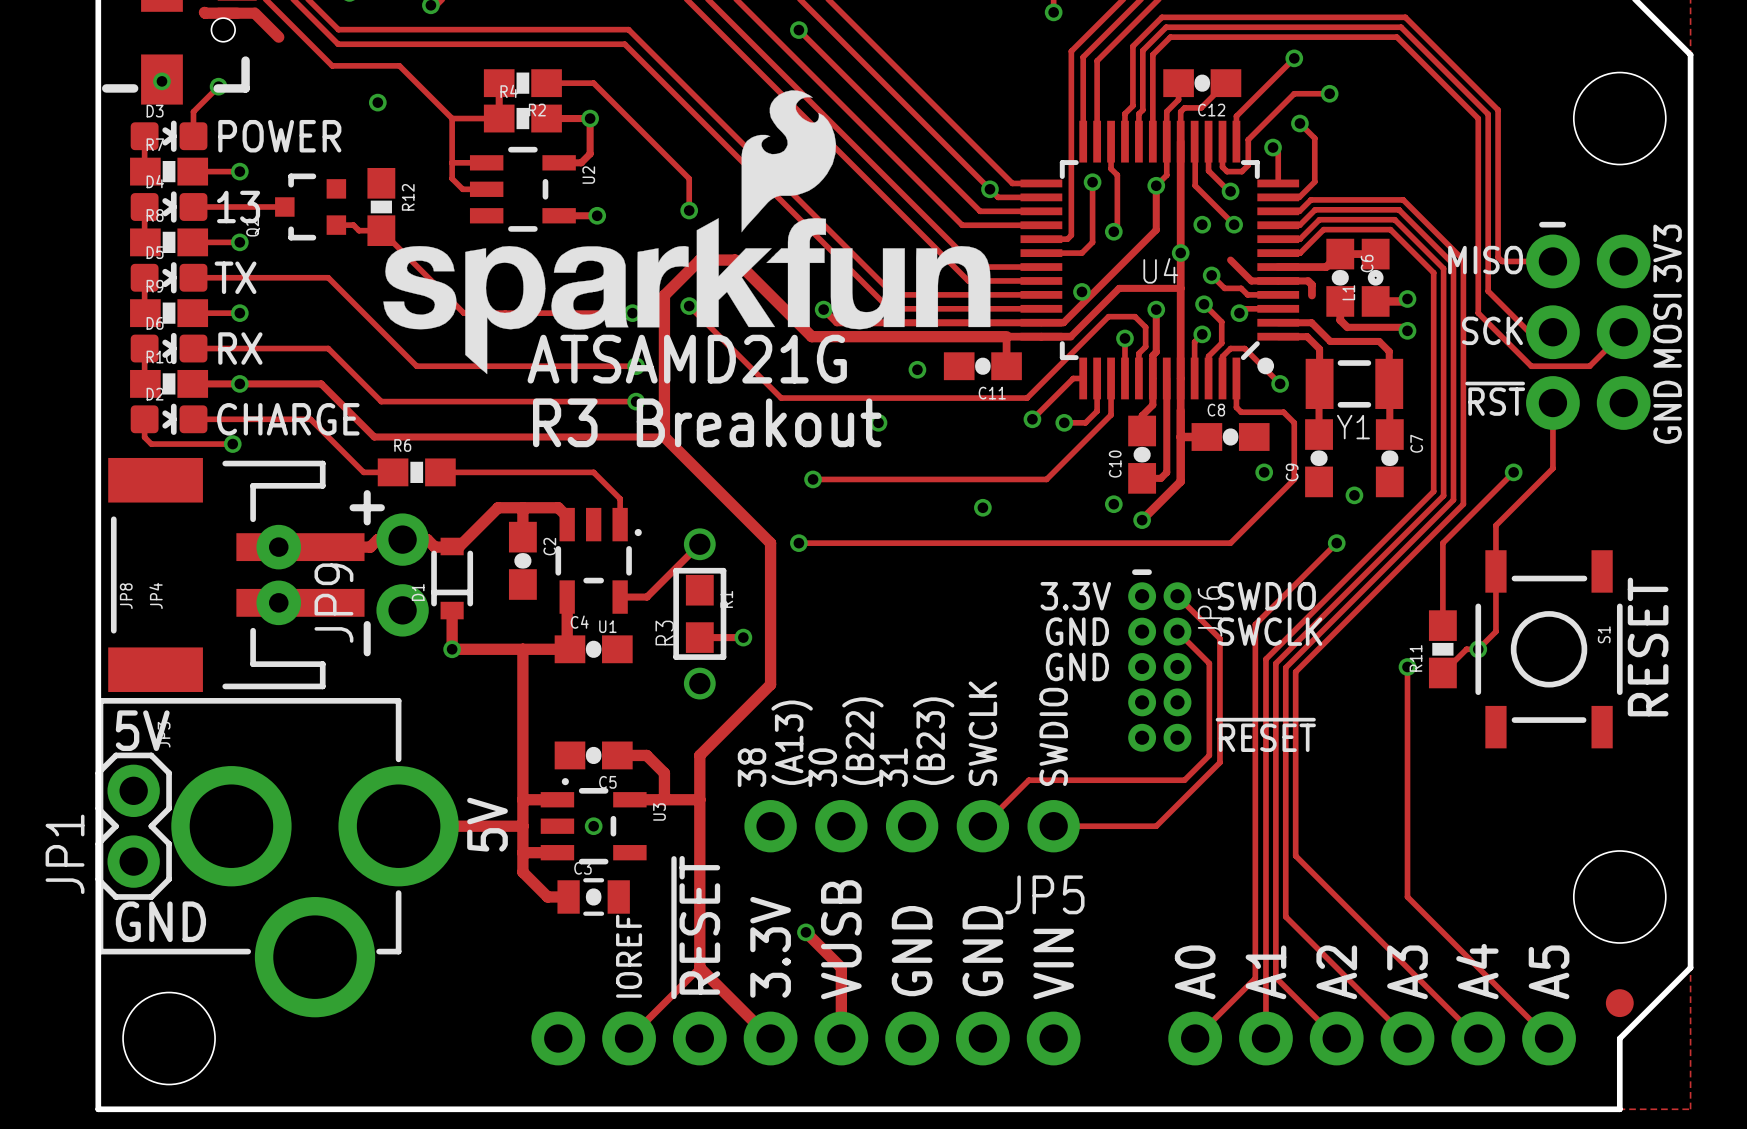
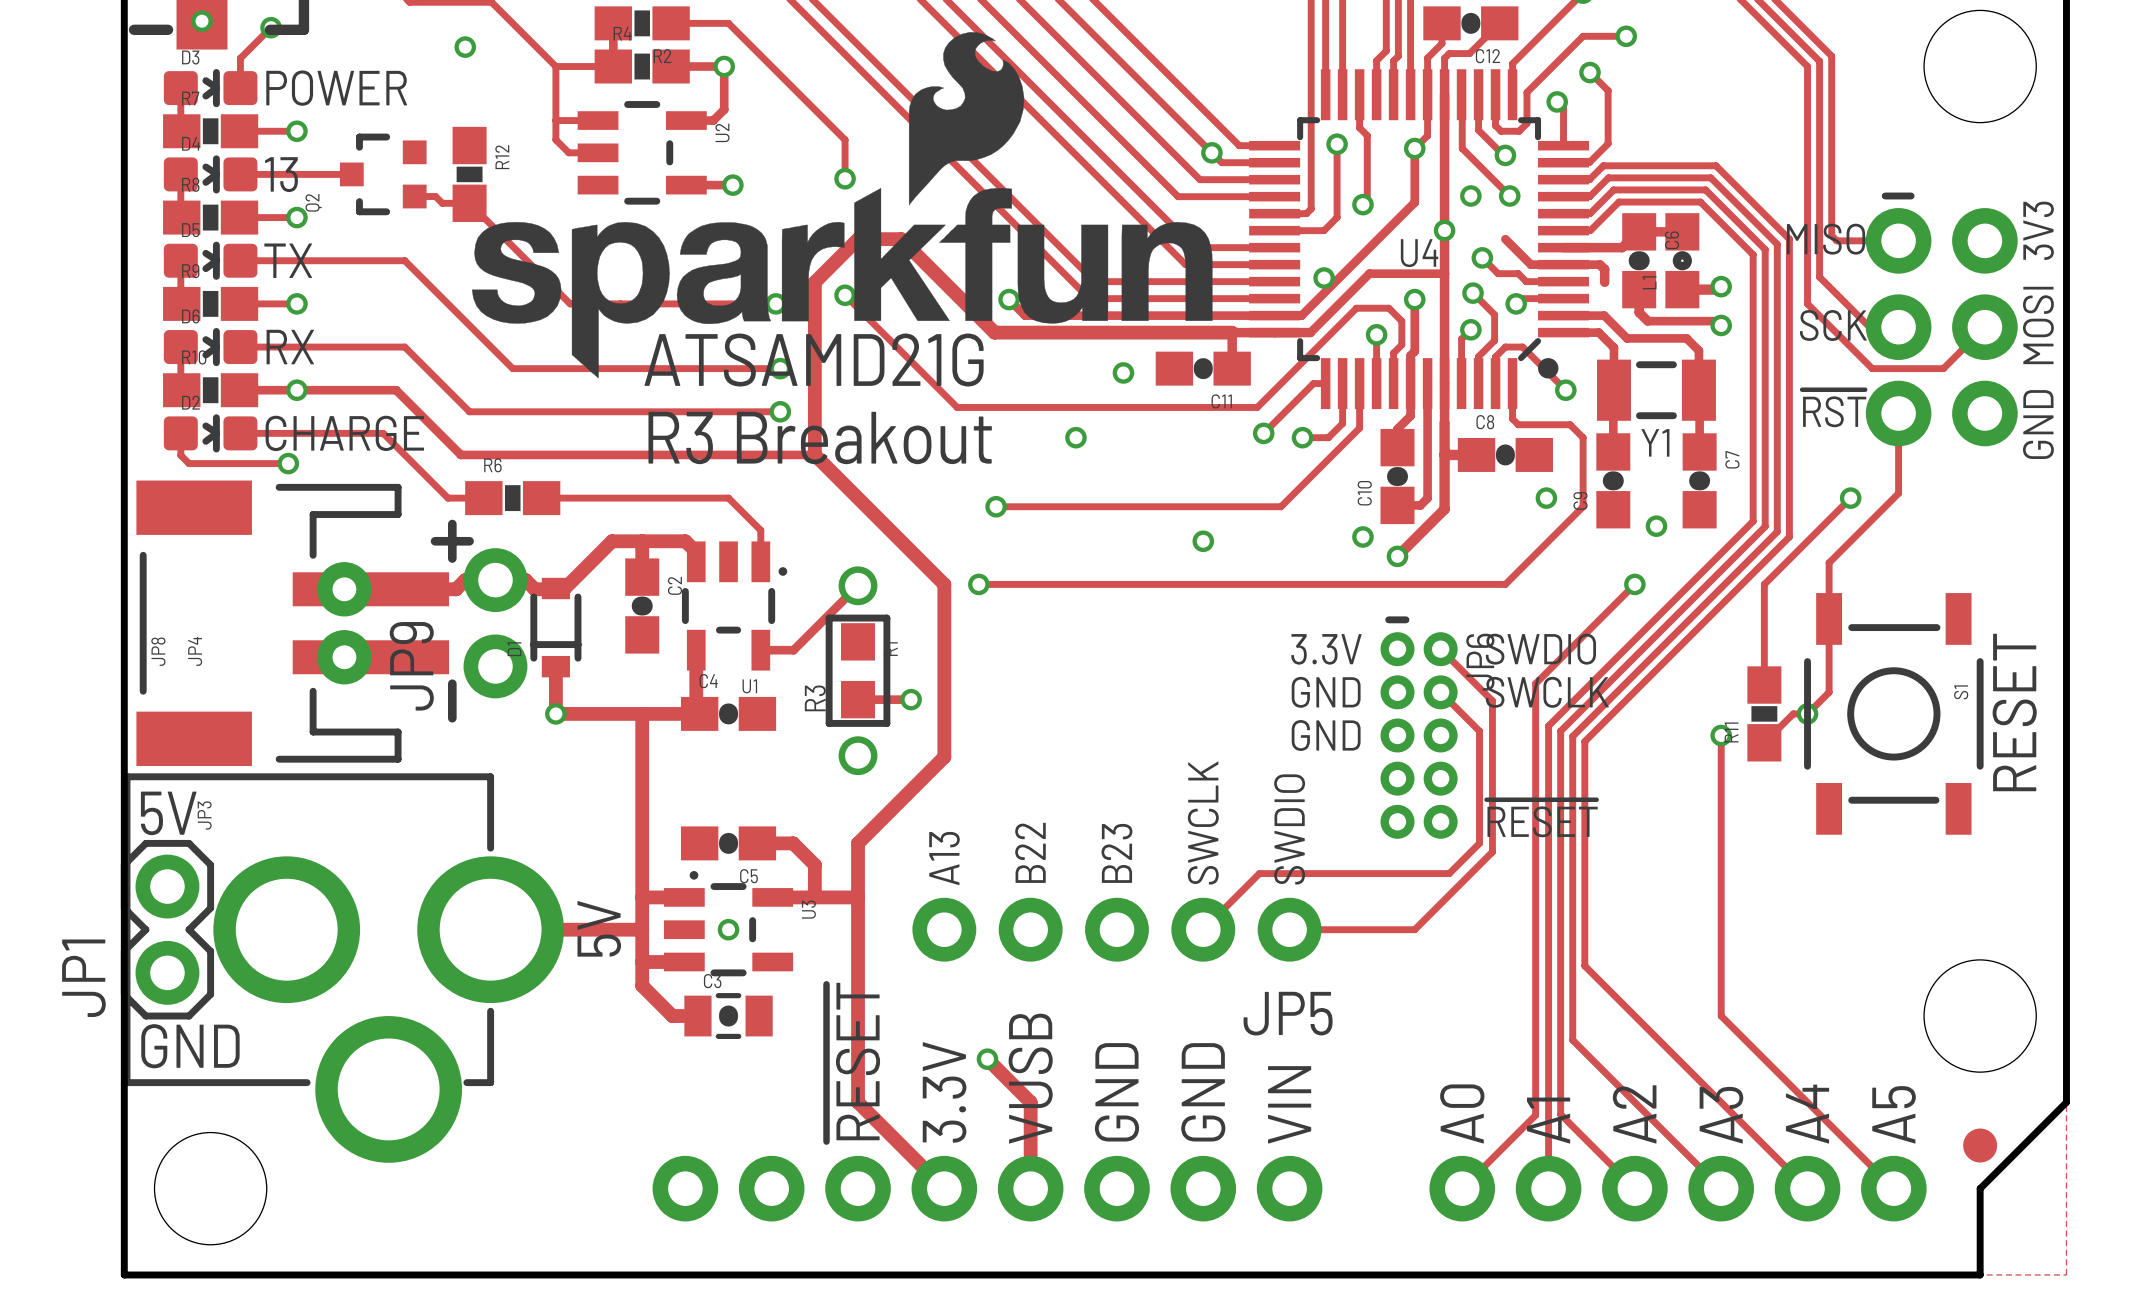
text: (B22) (862, 741) -> B22 (1030, 852)
text: (B23) (933, 741) -> B23 (1116, 853)
text: (A13) (792, 742) -> A13 (944, 858)
text: 38 (752, 767) -> none
text: 30 (822, 767) -> none
text: 31 (893, 767) -> none
text: IOREF (629, 956) -> none
track: (699, 967) (629, 1038) -> none

